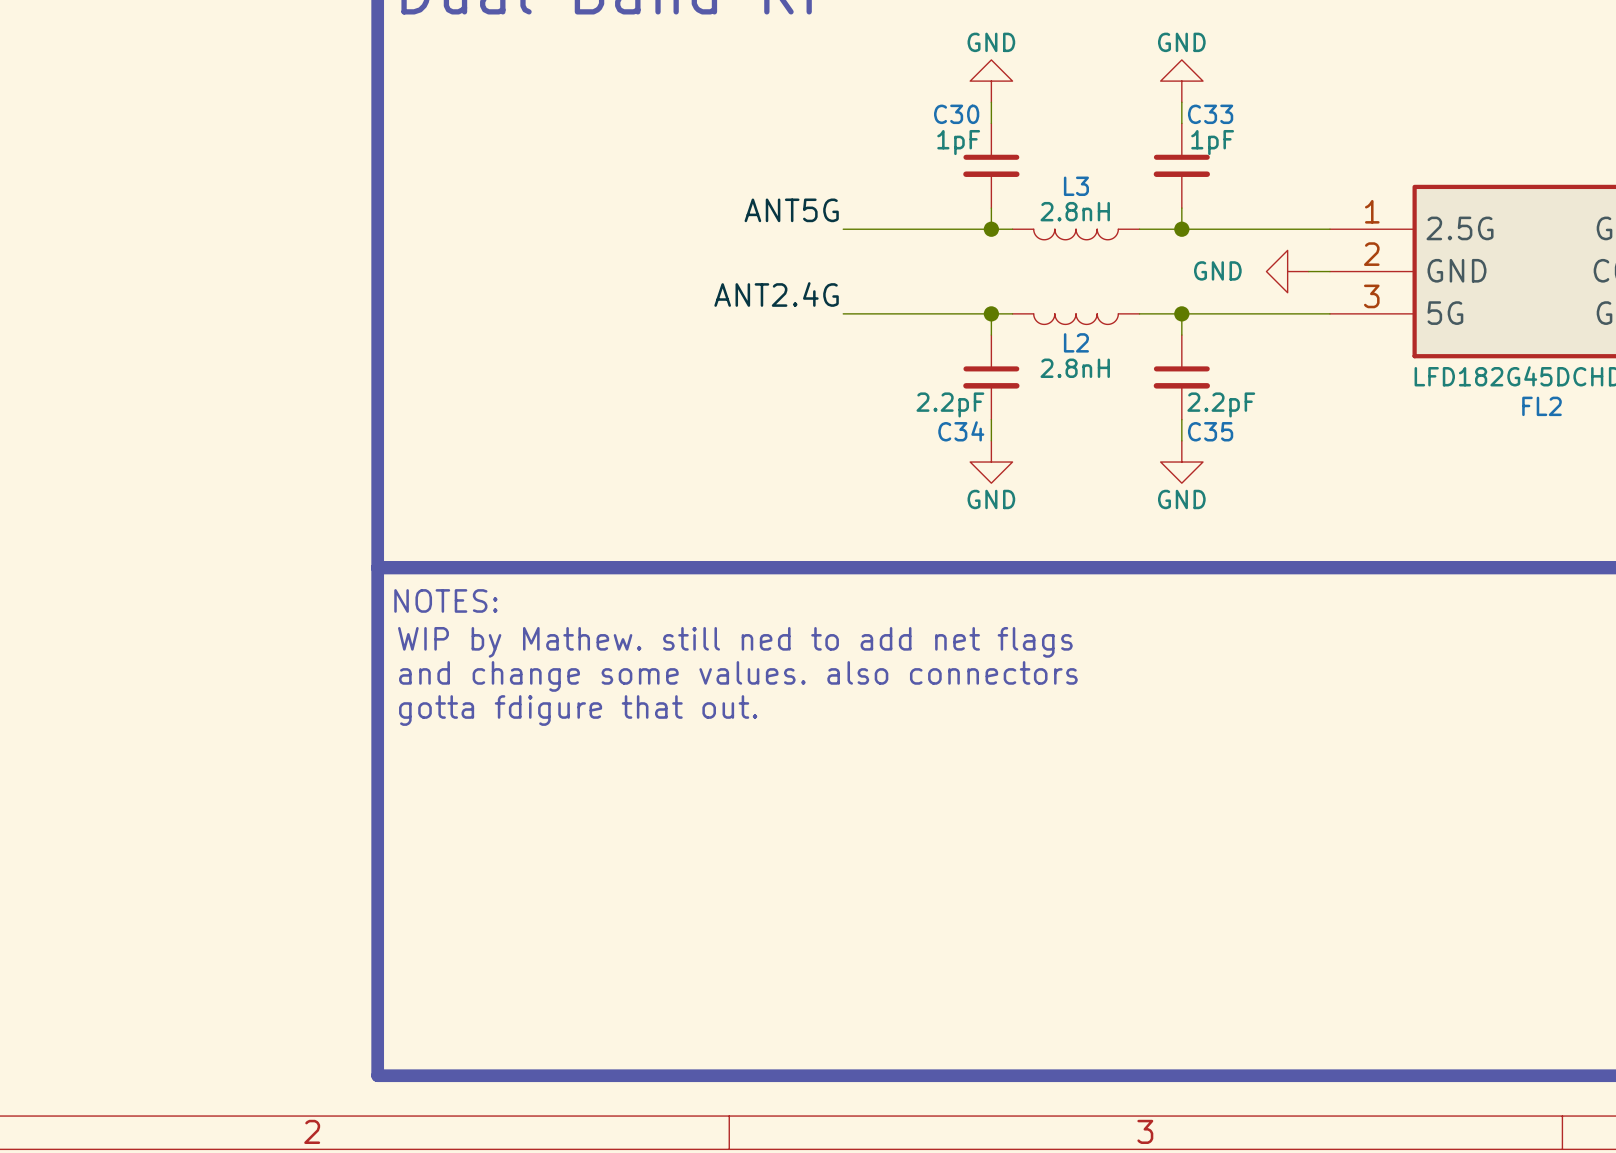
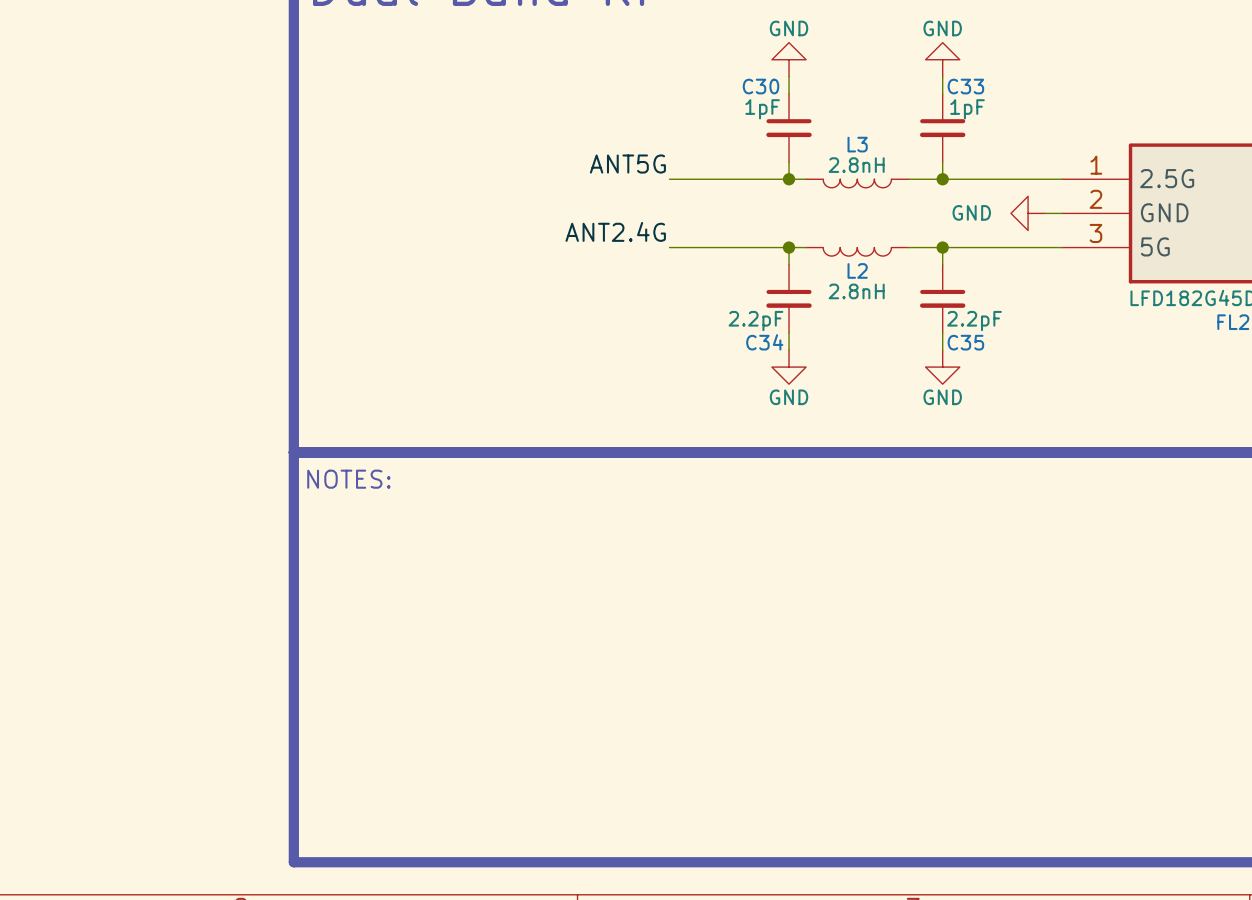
text: WIP by Mathew. still ned to add net flags (735, 642) -> none
text: and change some values. also connectors (738, 676) -> none
text: gotta fdigure that out. (578, 710) -> none

